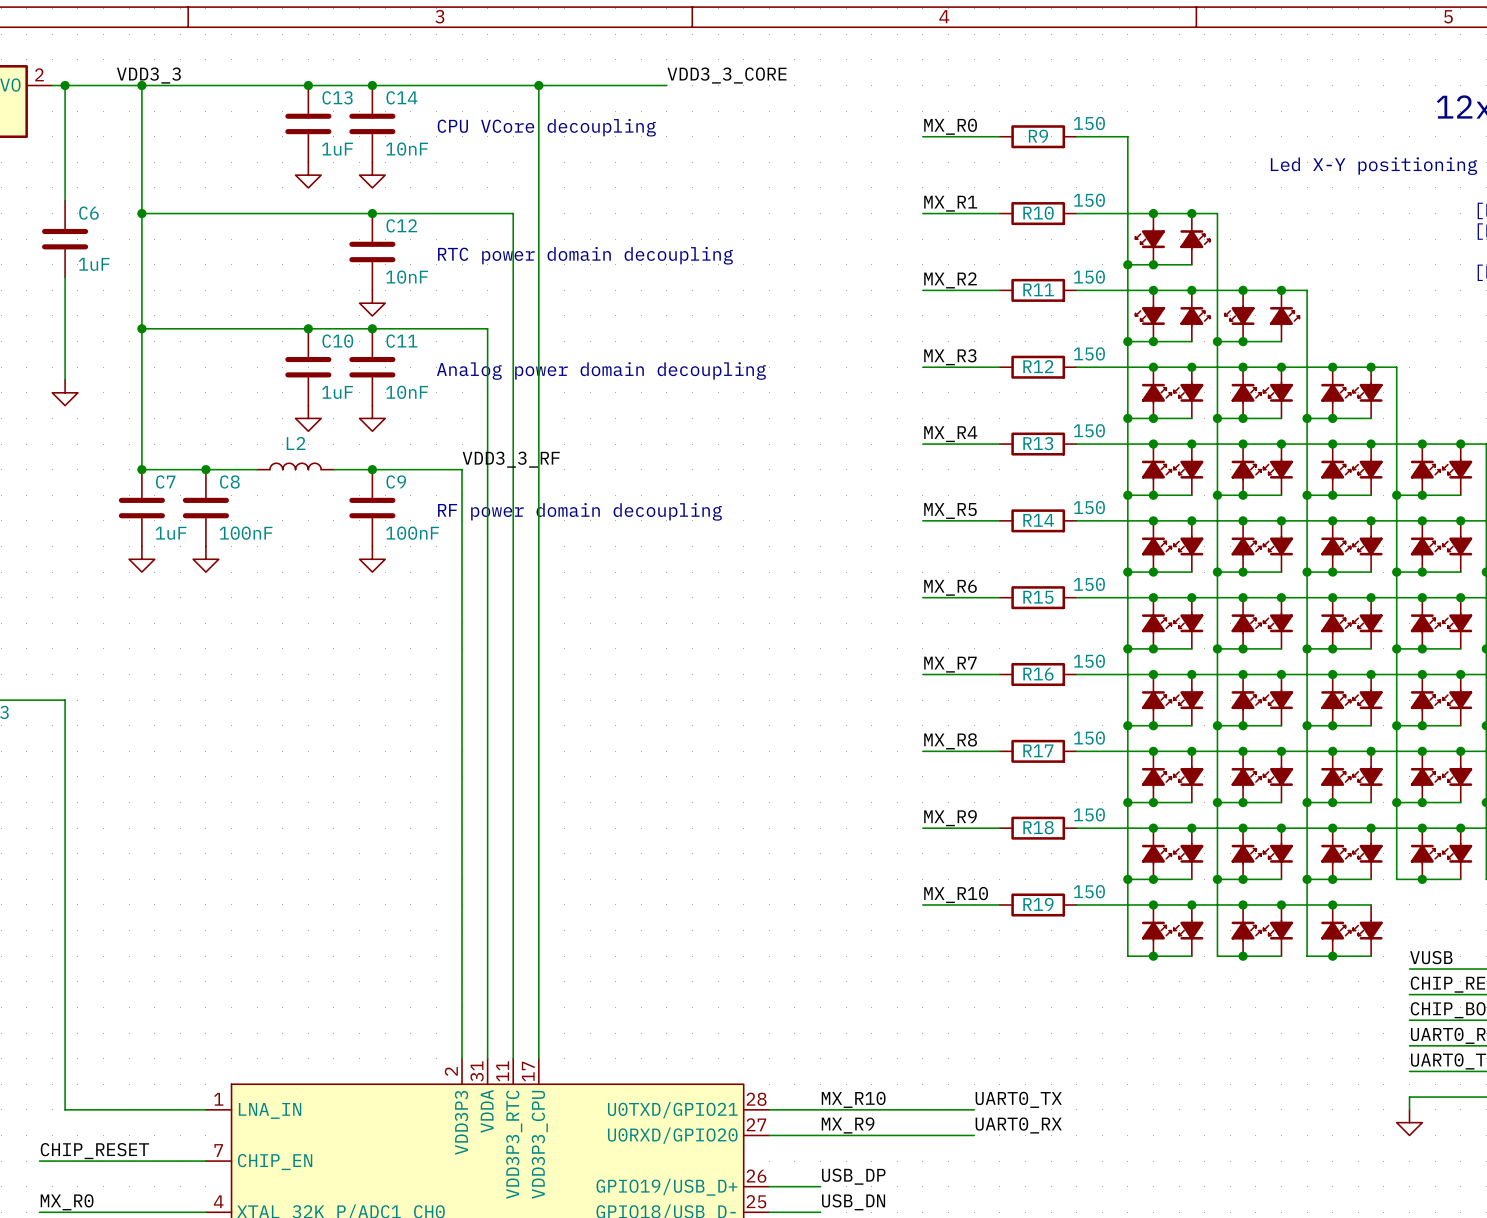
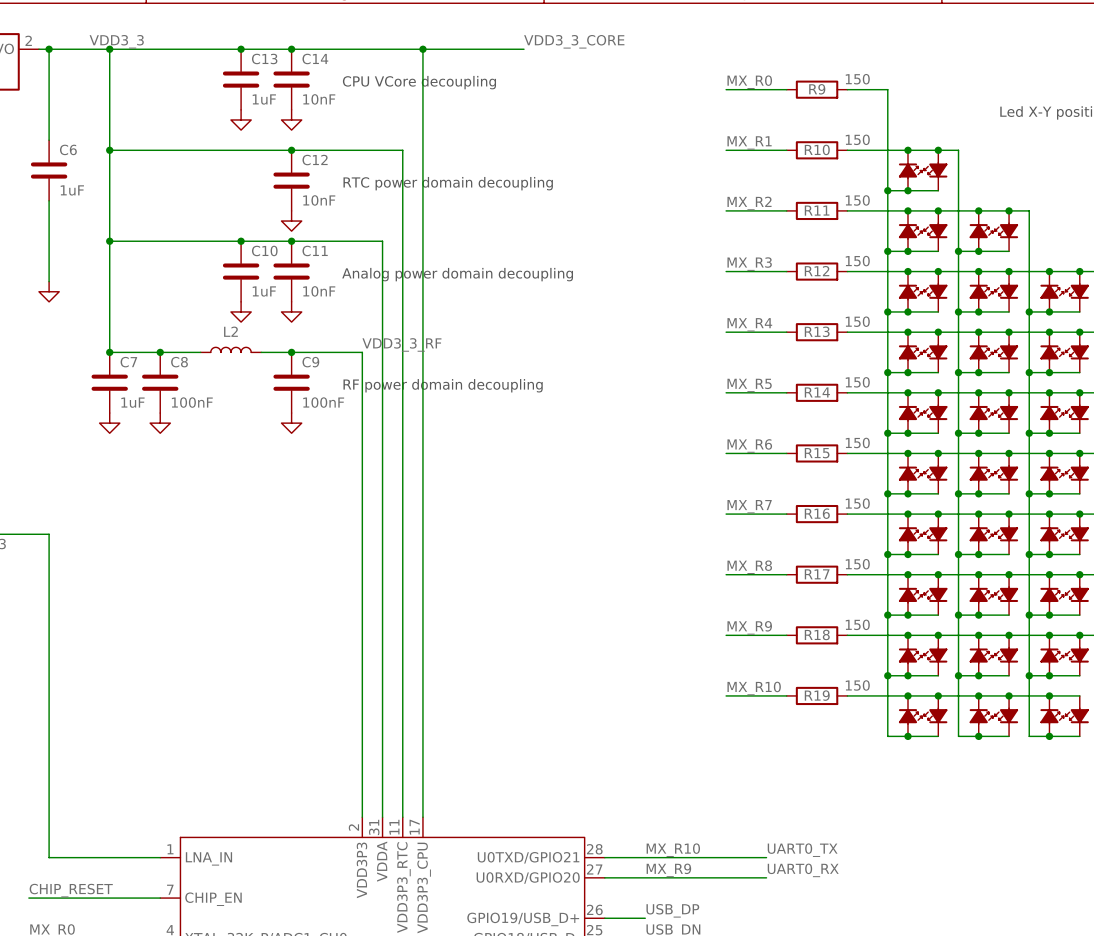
part rotation: 0° (1150, 238) -> 180° (910, 171)
part rotation: 0° (1195, 239) -> 180° (935, 170)
part rotation: 0° (1150, 315) -> 180° (910, 231)
part rotation: 0° (1239, 315) -> 180° (981, 231)
part rotation: 0° (1195, 316) -> 180° (935, 230)
part rotation: 0° (1284, 316) -> 180° (1006, 230)

